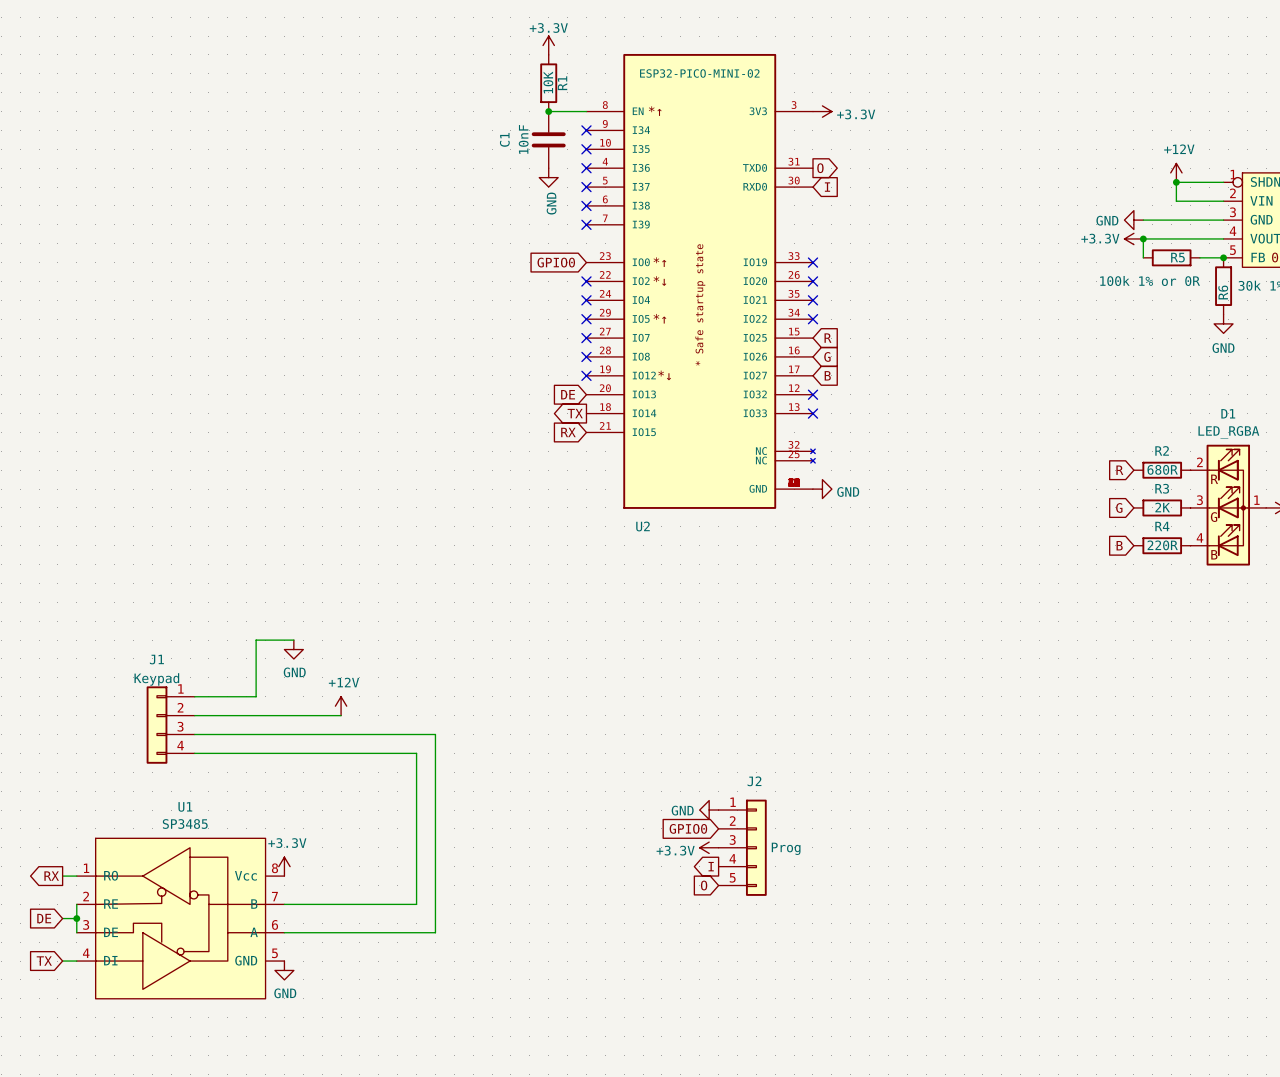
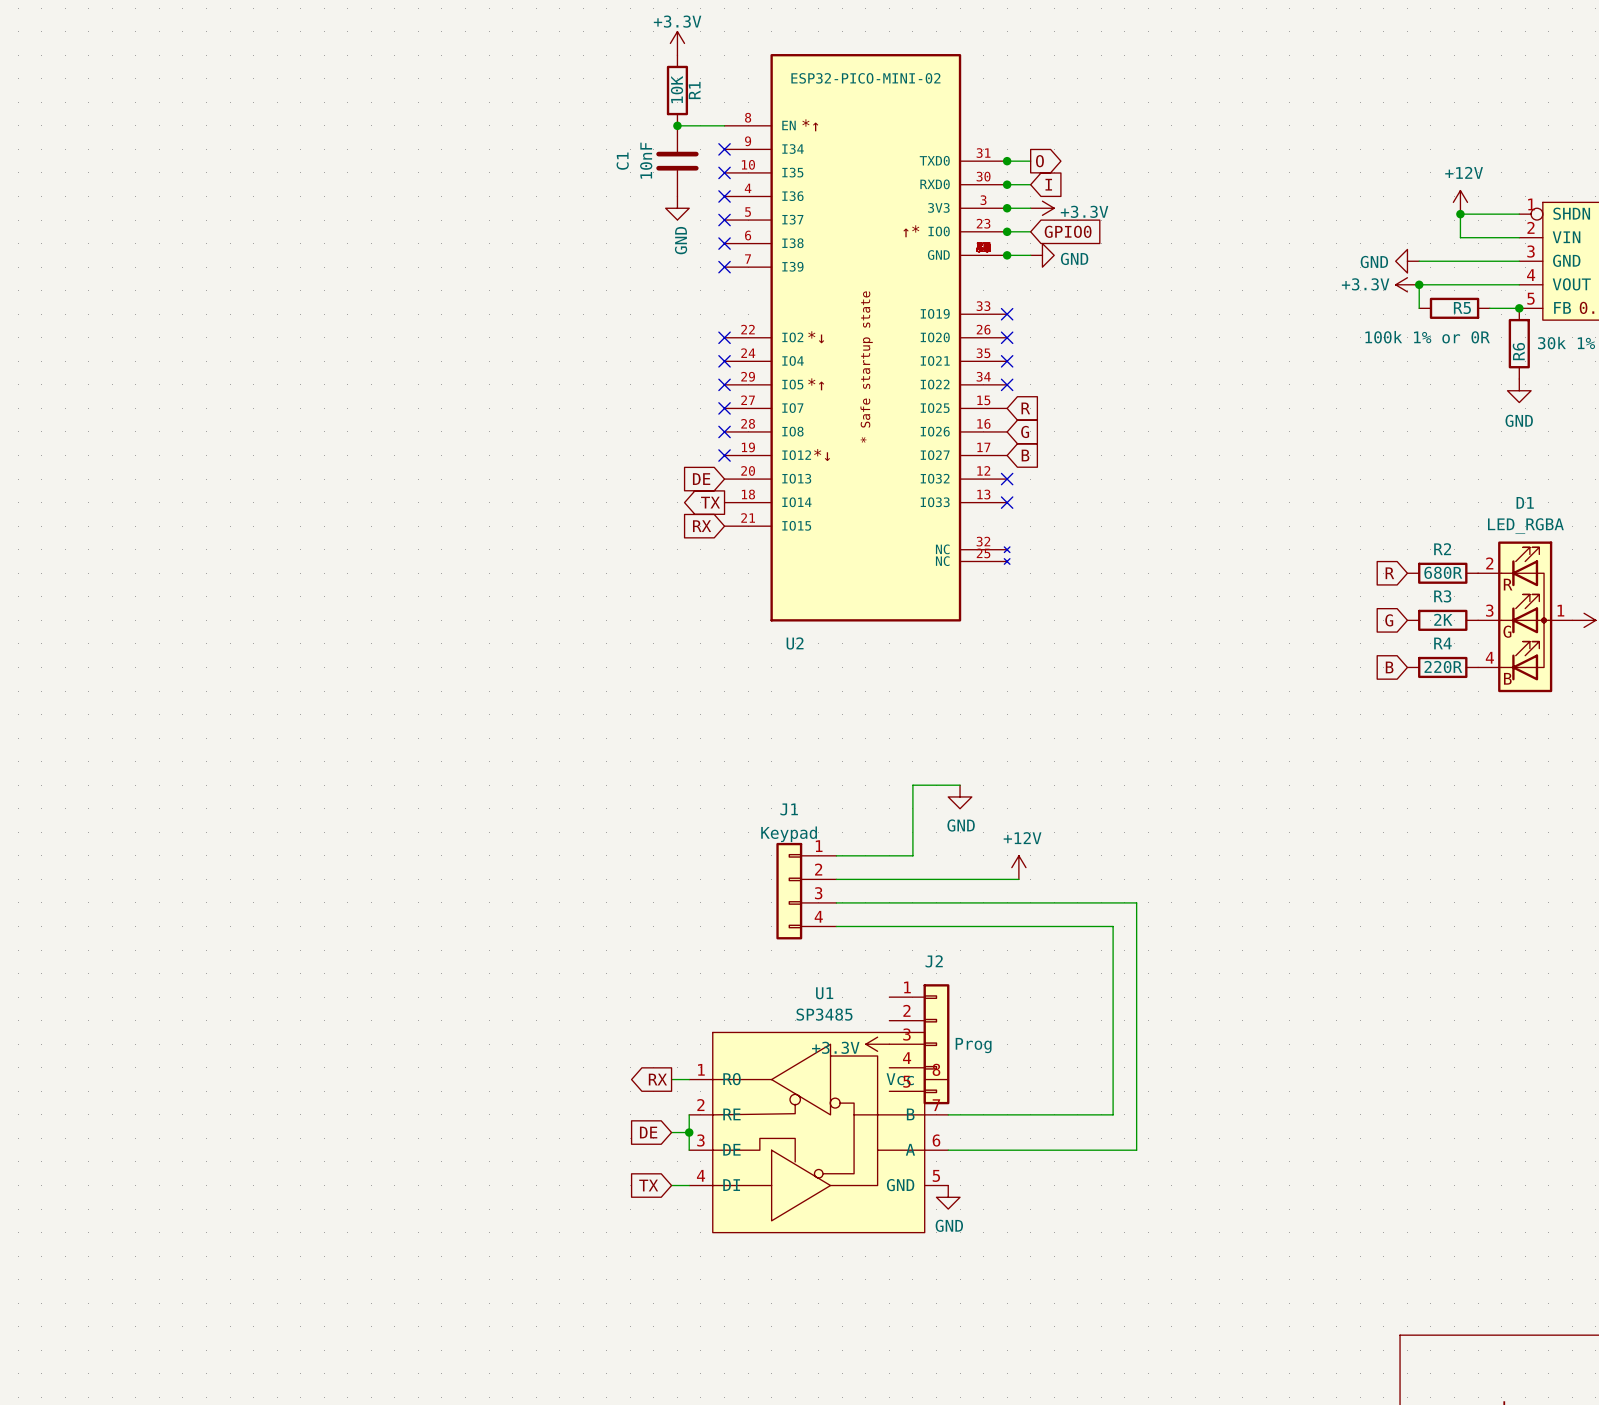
U2 symbol: [586, 53, 816, 509] -> [724, 54, 1010, 622]
power symbol position: +3.3V (822, 111) -> +3.3V (1042, 208)
wire: none -> (1007, 161) (1030, 161)
junction: none -> (1007, 161)
junction: none -> (1007, 184)
global label position: O (820, 168) -> O (1039, 161)
junction: none -> (1007, 208)
global label position: I (827, 187) -> I (1048, 184)
junction: none -> (1007, 231)
global label: none -> GPIO0 (1068, 231)
wire: none -> (1007, 255) (1030, 255)
junction: none -> (1007, 255)
power symbol: none -> GND (1042, 255)
global label: GPIO0 (556, 262) -> none
power symbol: GND (822, 489) -> none
wire: (293, 640) (256, 640) (256, 696) (194, 696) -> none
wire: none -> (960, 785) (912, 785) (912, 855) (836, 855)
power symbol: GND (293, 649) -> none
power symbol: none -> GND (960, 796)
power symbol: +12V (341, 706) -> none
power symbol: none -> +12V (1018, 867)
wire: (194, 715) (341, 715) -> none
wire: none -> (836, 879) (1018, 879)
J1 position: (170, 725) -> (806, 891)
wire: (194, 734) (435, 734) (435, 932) (284, 932) -> none
wire: none -> (836, 902) (1136, 902) (1136, 1150) (948, 1150)
wire: (194, 753) (416, 753) (416, 904) (284, 904) -> none
wire: none -> (836, 926) (1113, 926) (1113, 1114) (948, 1114)
power symbol: GND (709, 810) -> none
global label: GPIO0 (688, 828) -> none
power symbol: +3.3V (284, 866) -> none
global label: I (711, 866) -> none
global label: RX (51, 876) -> none
wire: (62, 876) (76, 876) -> none
global label: none -> RX (657, 1079)
wire: none -> (671, 1079) (689, 1079)
global label: O (704, 885) -> none
wire: (76, 904) (76, 932) -> none
wire: none -> (689, 1114) (689, 1150)
global label: DE (44, 918) -> none
wire: (62, 918) (76, 918) -> none
junction: (76, 918) -> none
U1 position: (180, 918) -> (818, 1132)
global label: none -> DE (648, 1132)
wire: none -> (671, 1132) (689, 1132)
junction: none -> (689, 1132)
global label: TX (44, 961) -> none
wire: (62, 961) (76, 961) -> none
global label: none -> TX (648, 1185)
wire: none -> (671, 1185) (689, 1185)
power symbol: GND (284, 970) -> none
power symbol: none -> GND (948, 1197)

